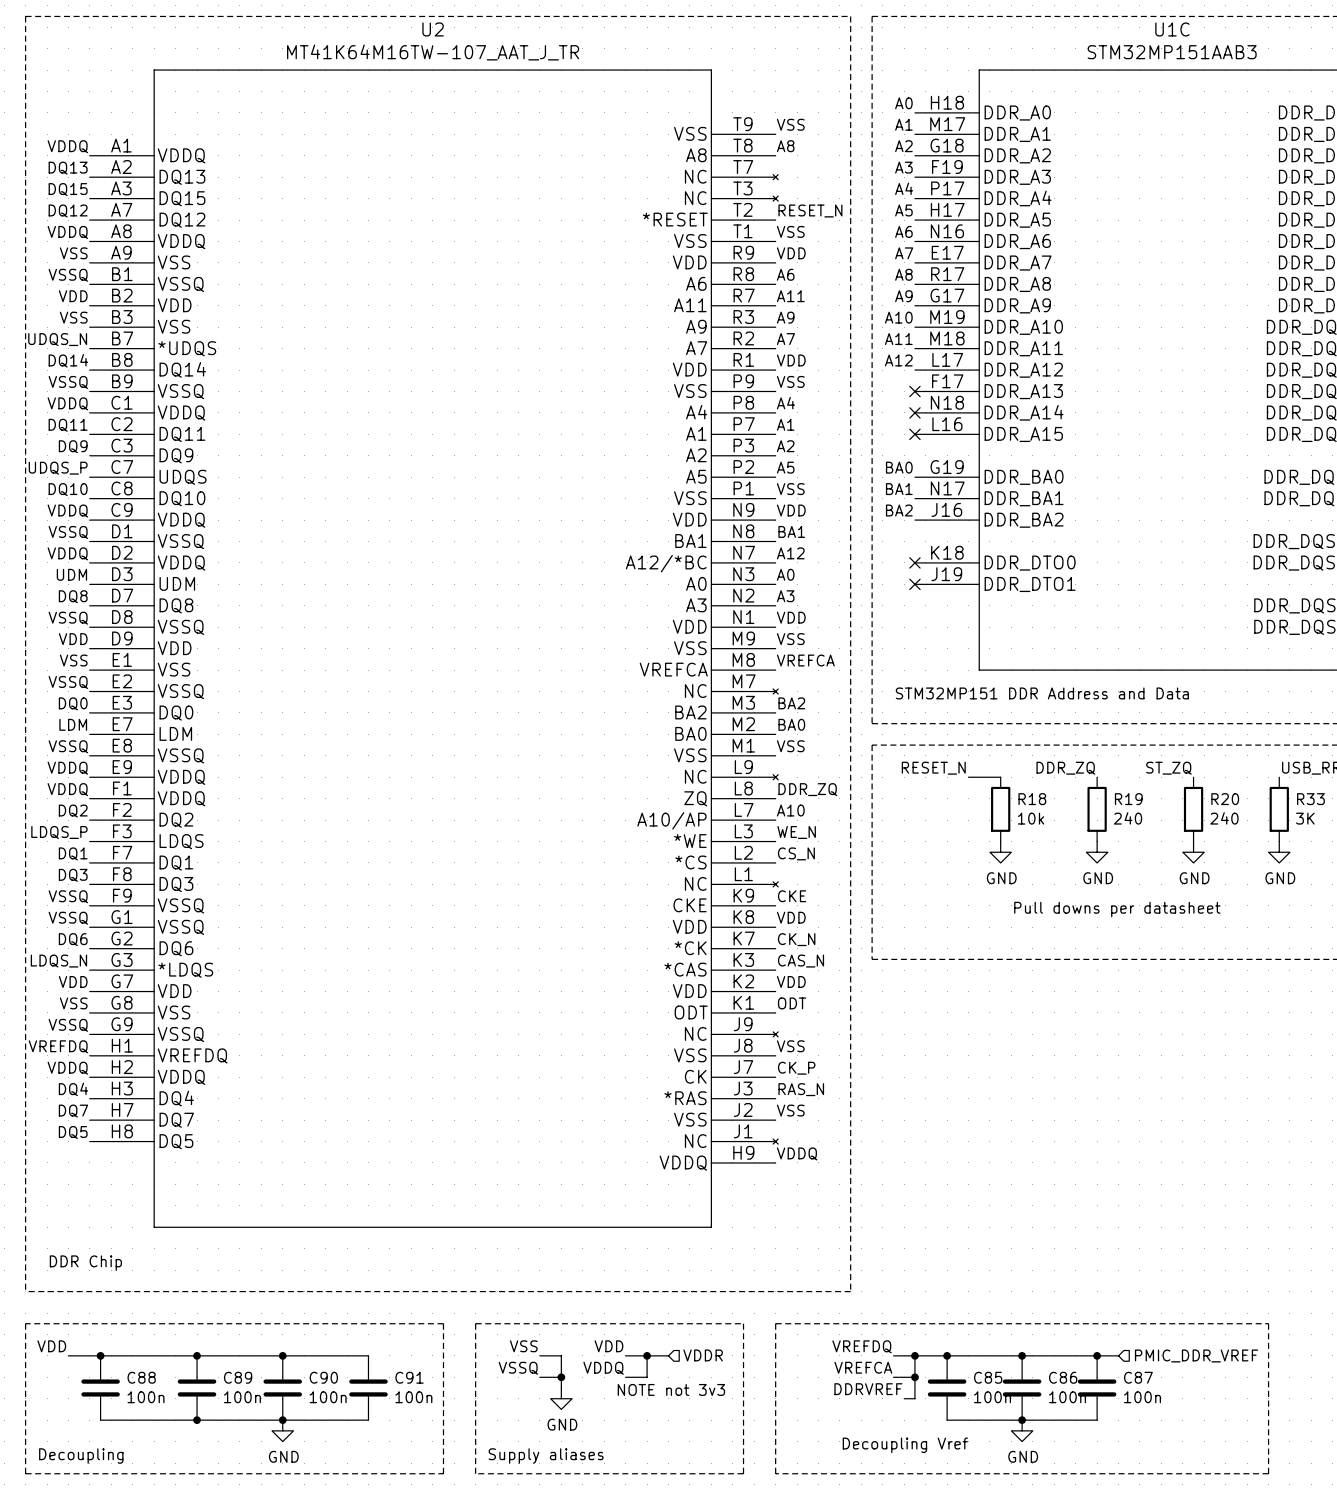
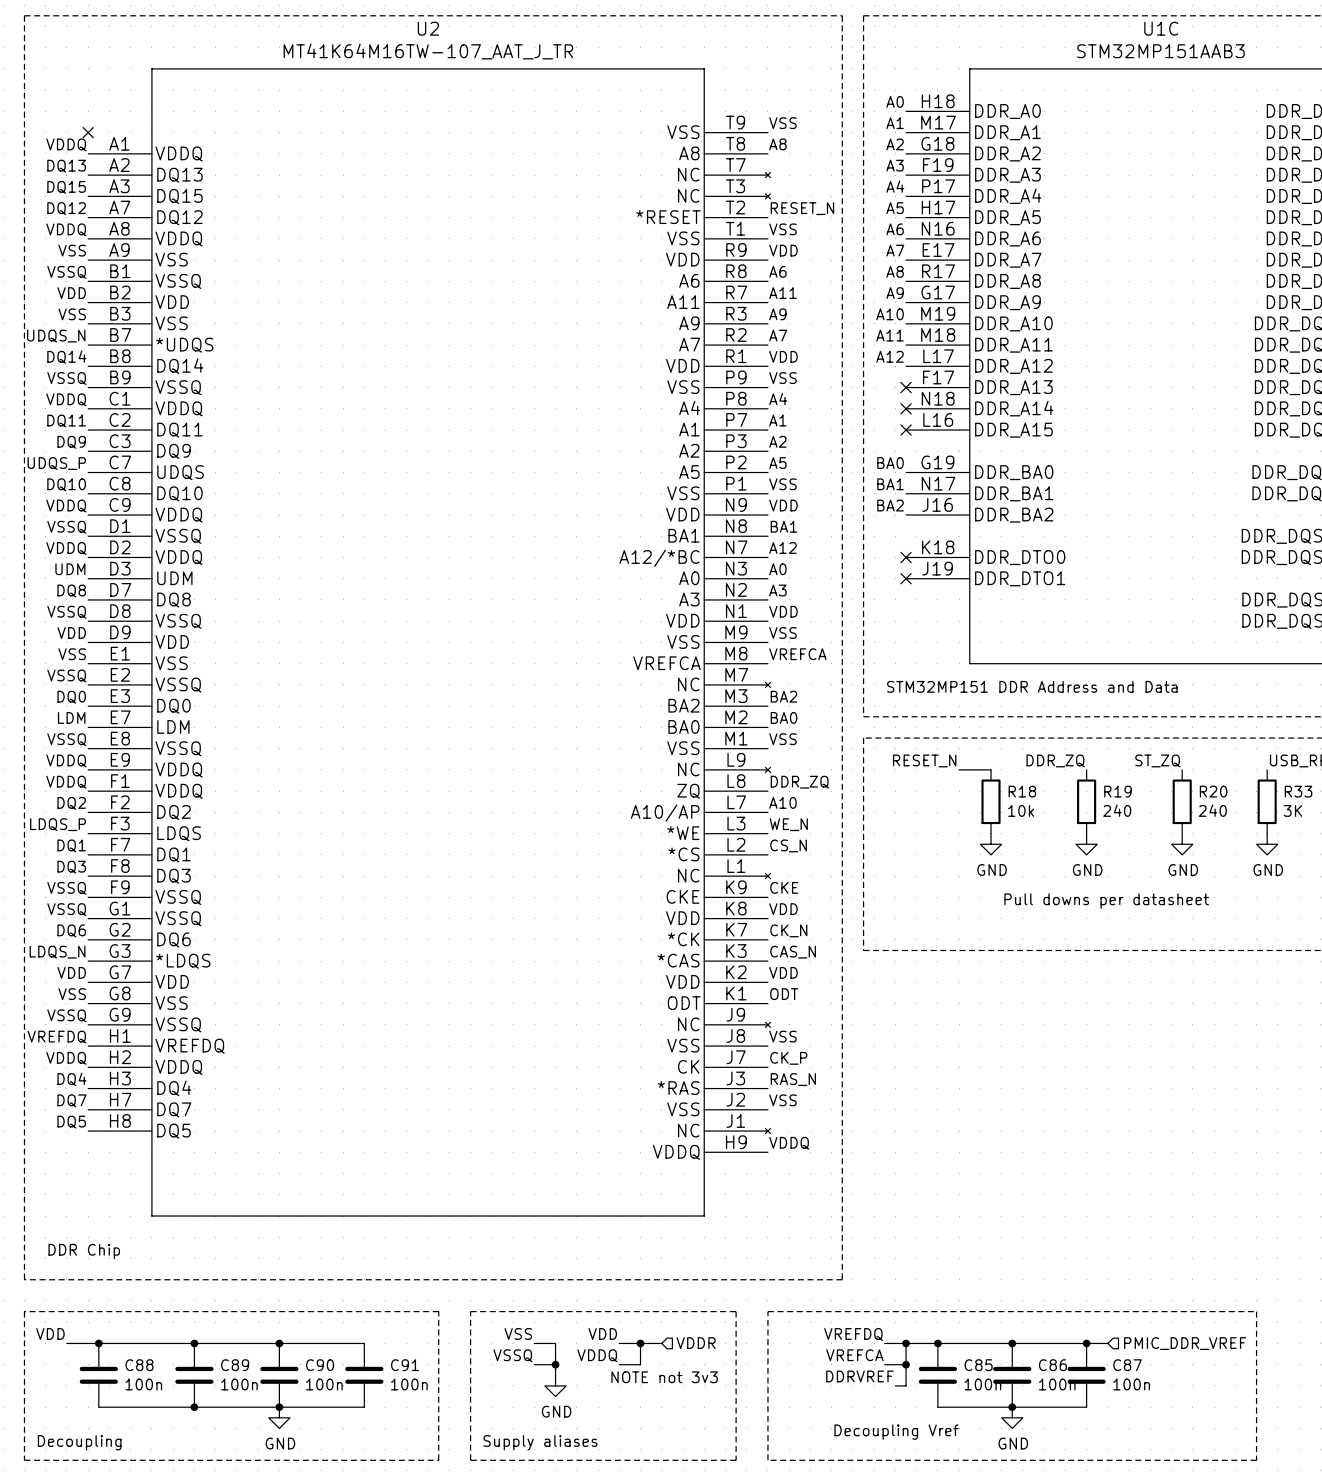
no-connect mark: none -> (88, 132)

